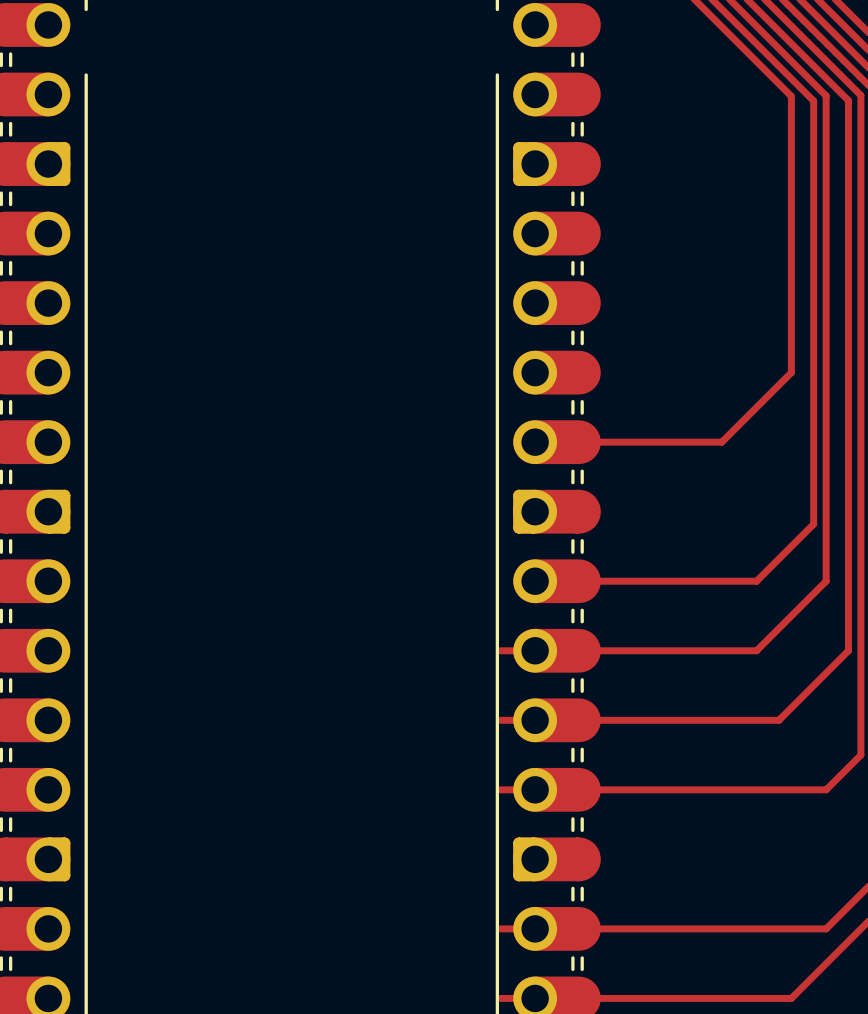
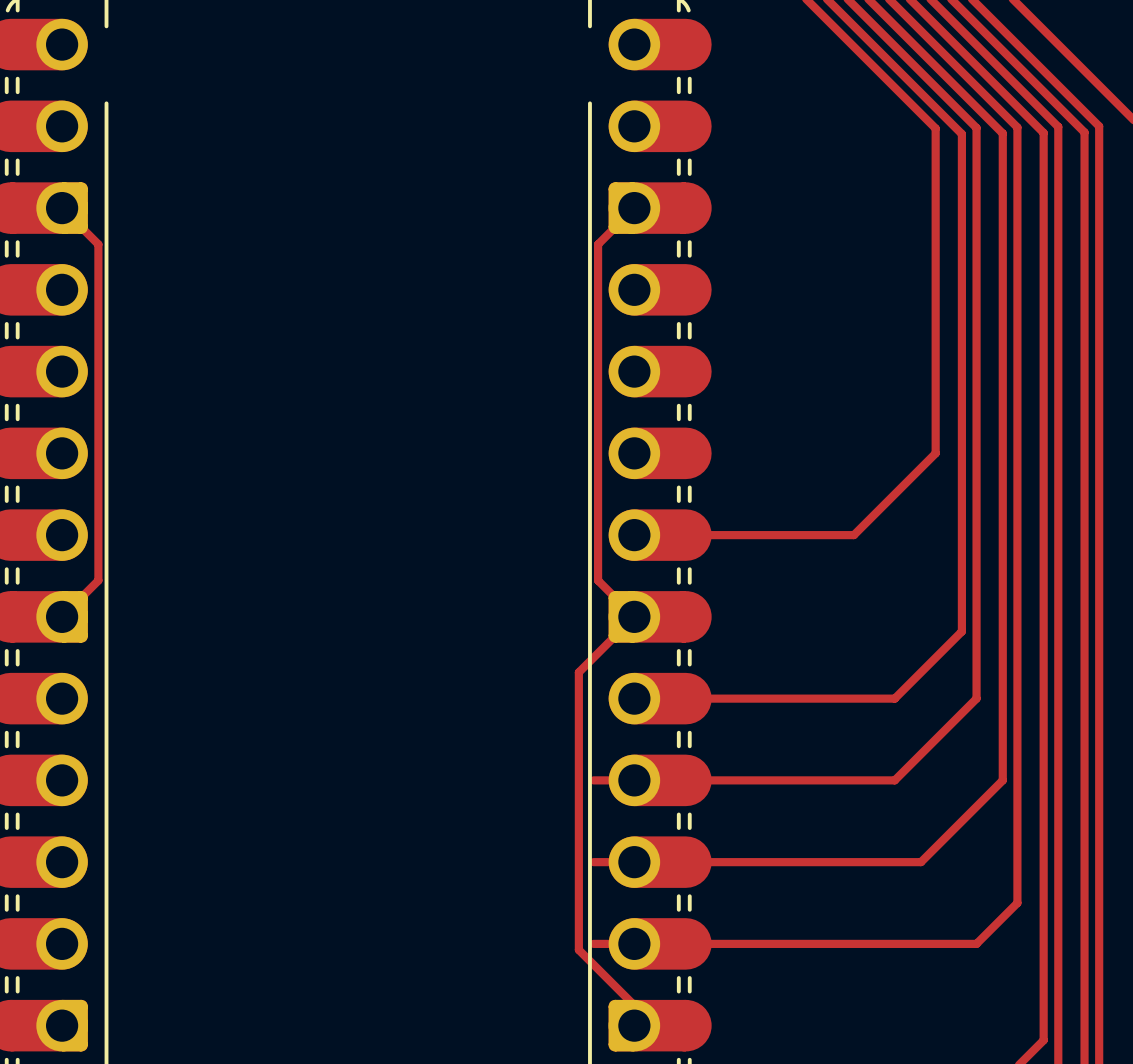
track: none -> (62, 208) (98, 244) (98, 580) (62, 616)
track: none -> (634, 208) (598, 244) (598, 580) (634, 616) (578, 672) (578, 949) (654, 1025) (660, 1025)

